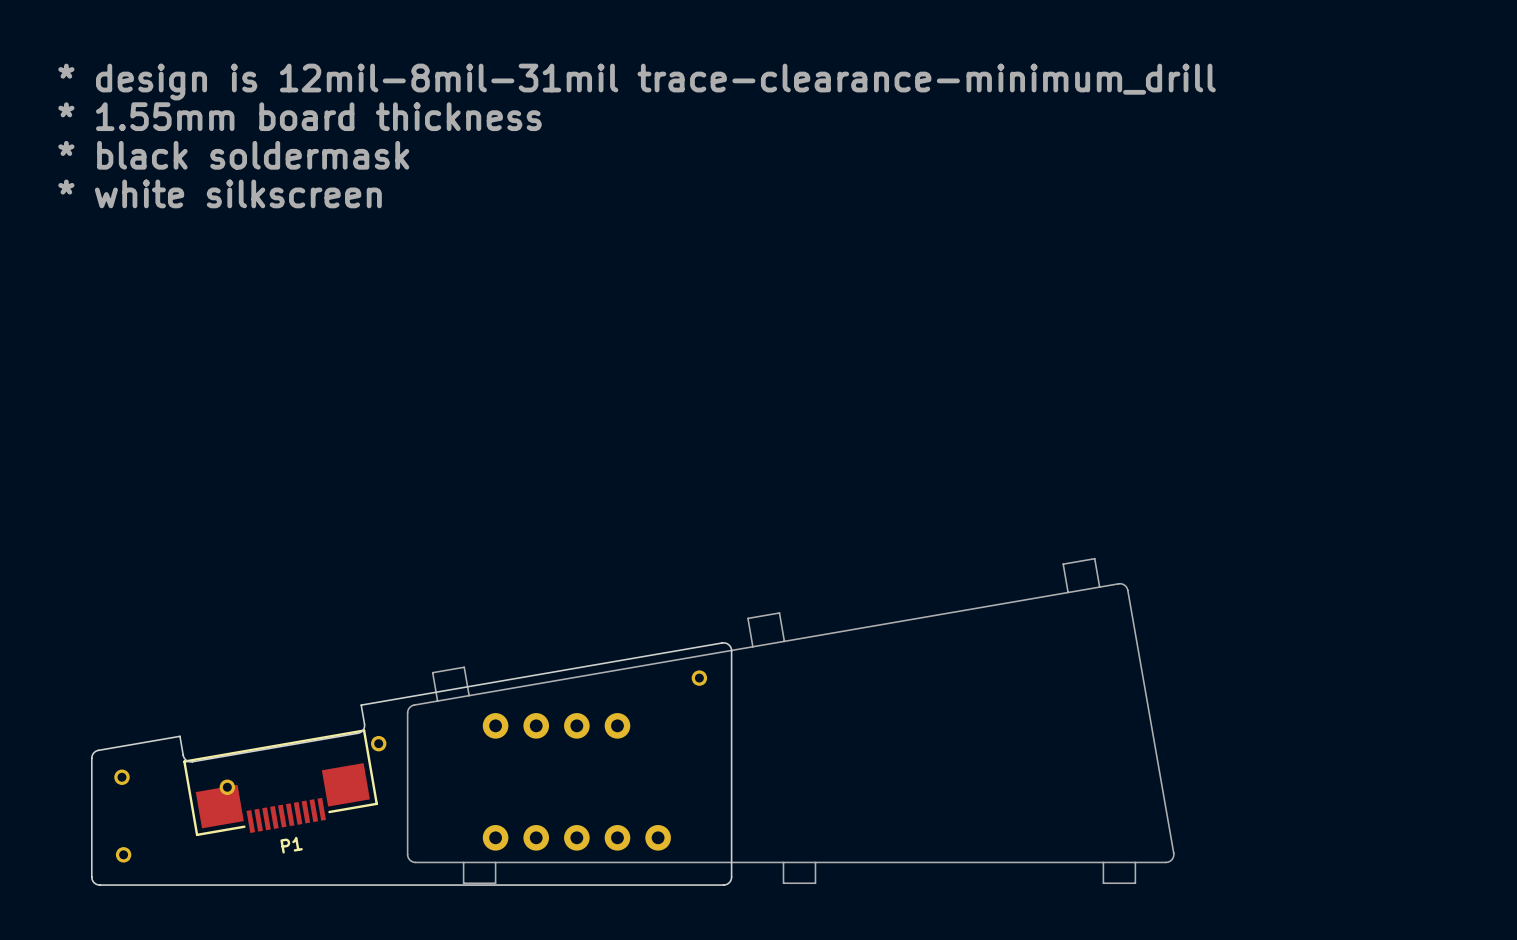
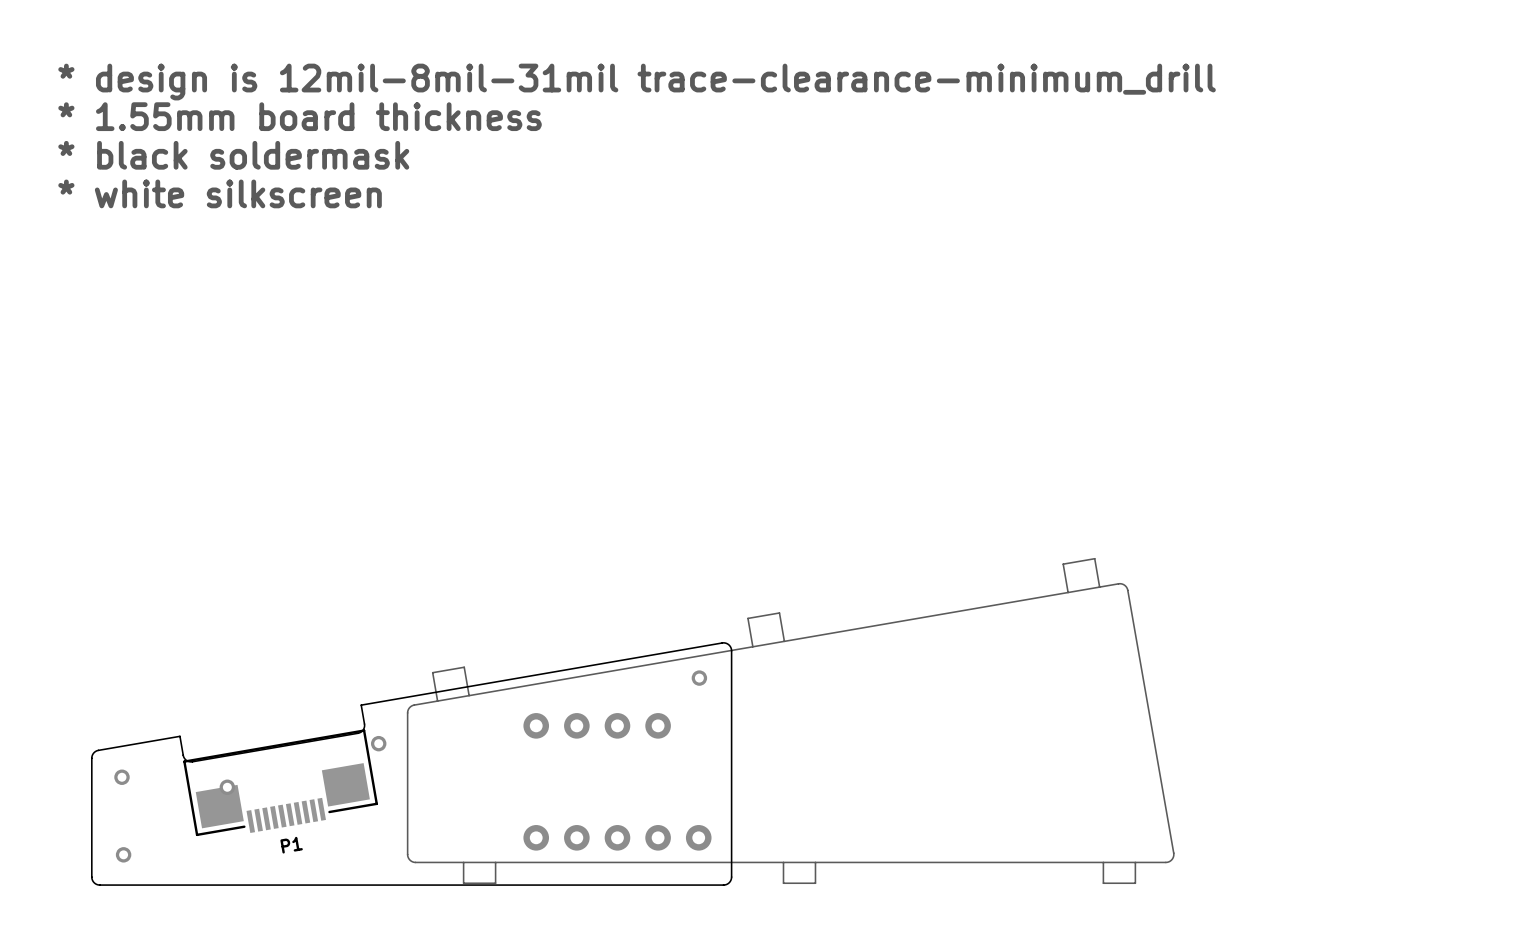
part footprint: [406, 557, 1175, 885] -> [406, 557, 1175, 885]

